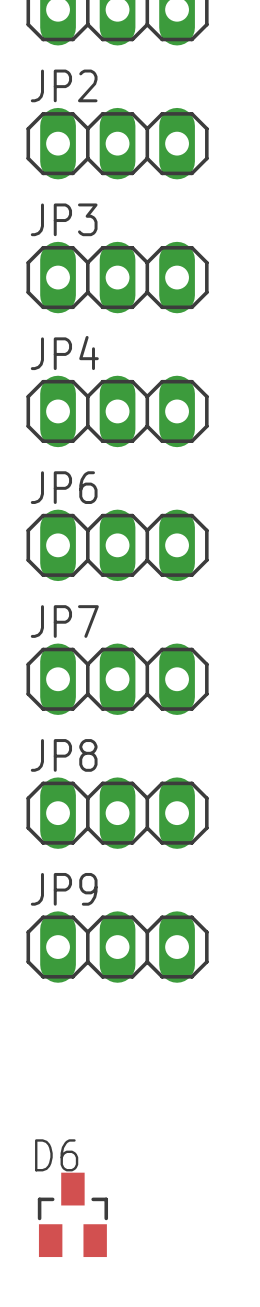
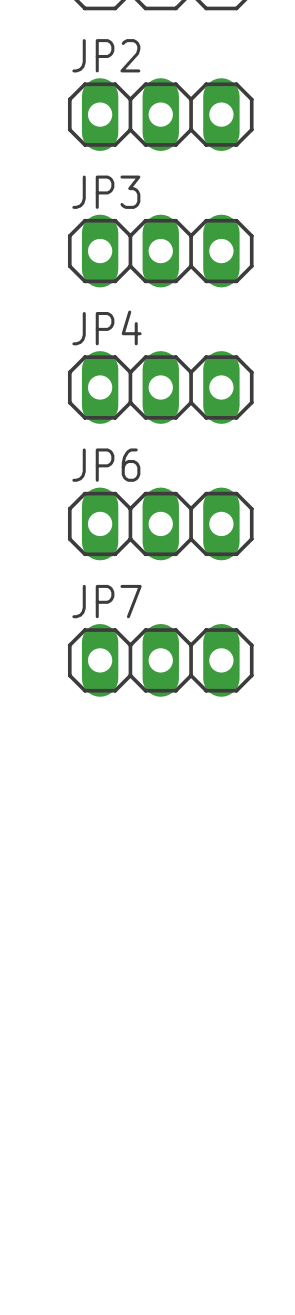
JP8: (117, 813) -> none
JP9: (117, 947) -> none
D6: (72, 1214) -> none

